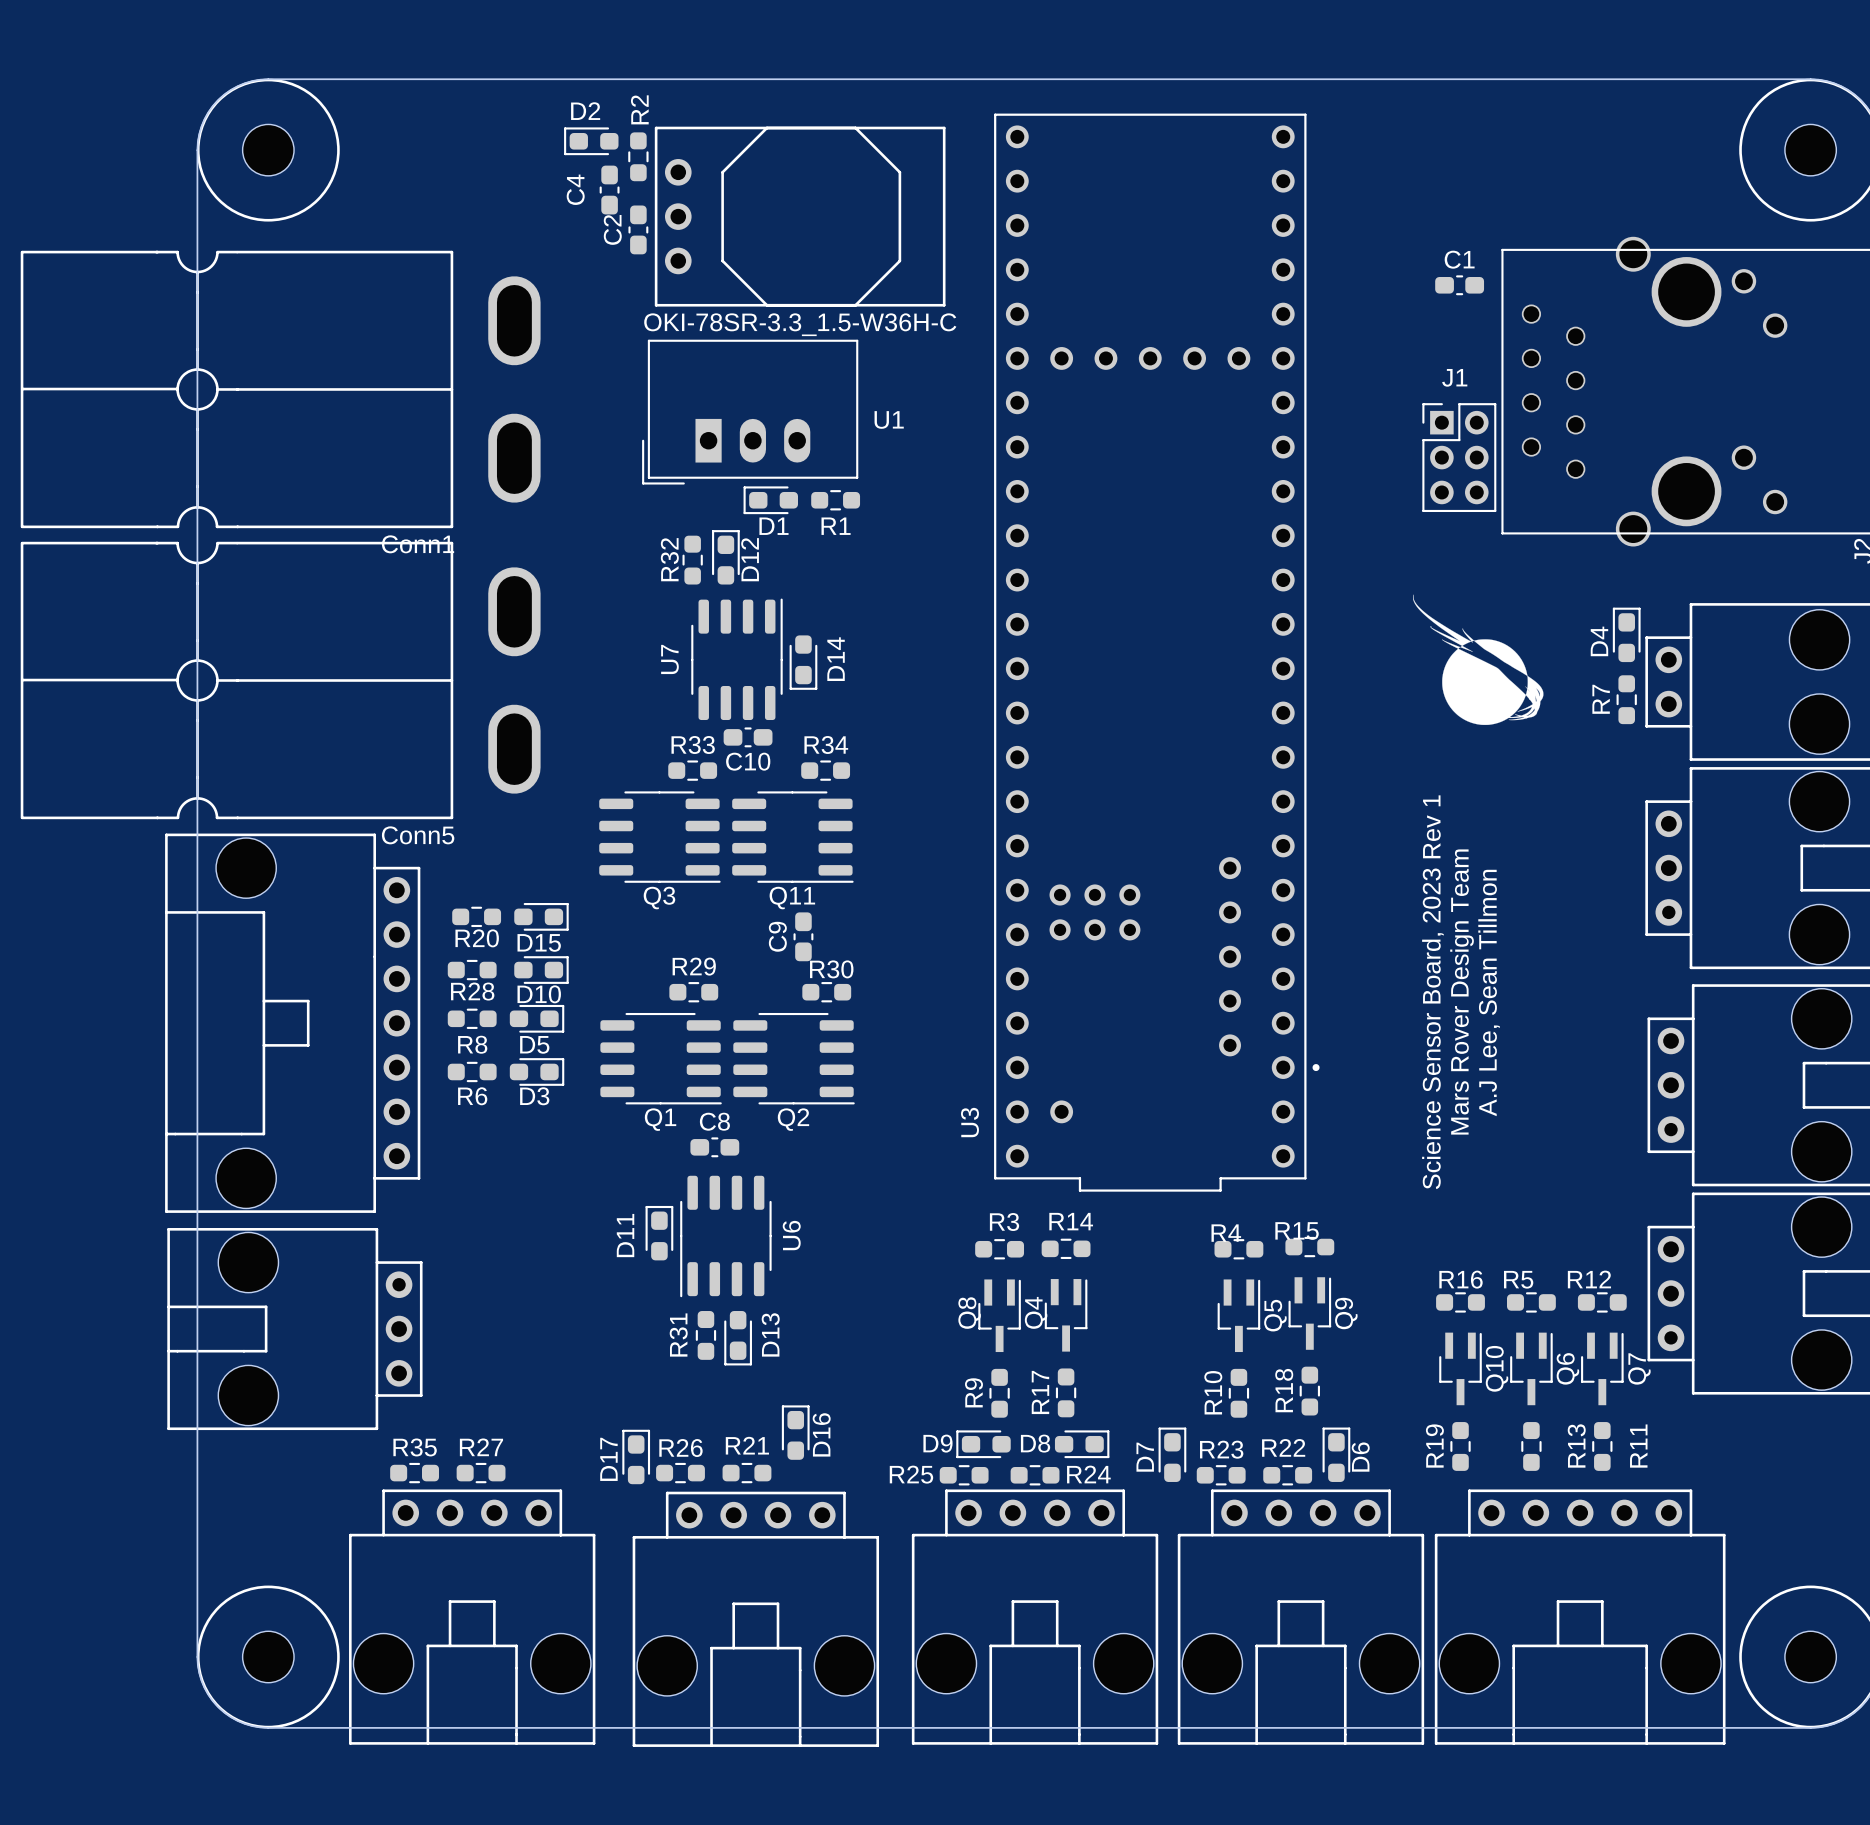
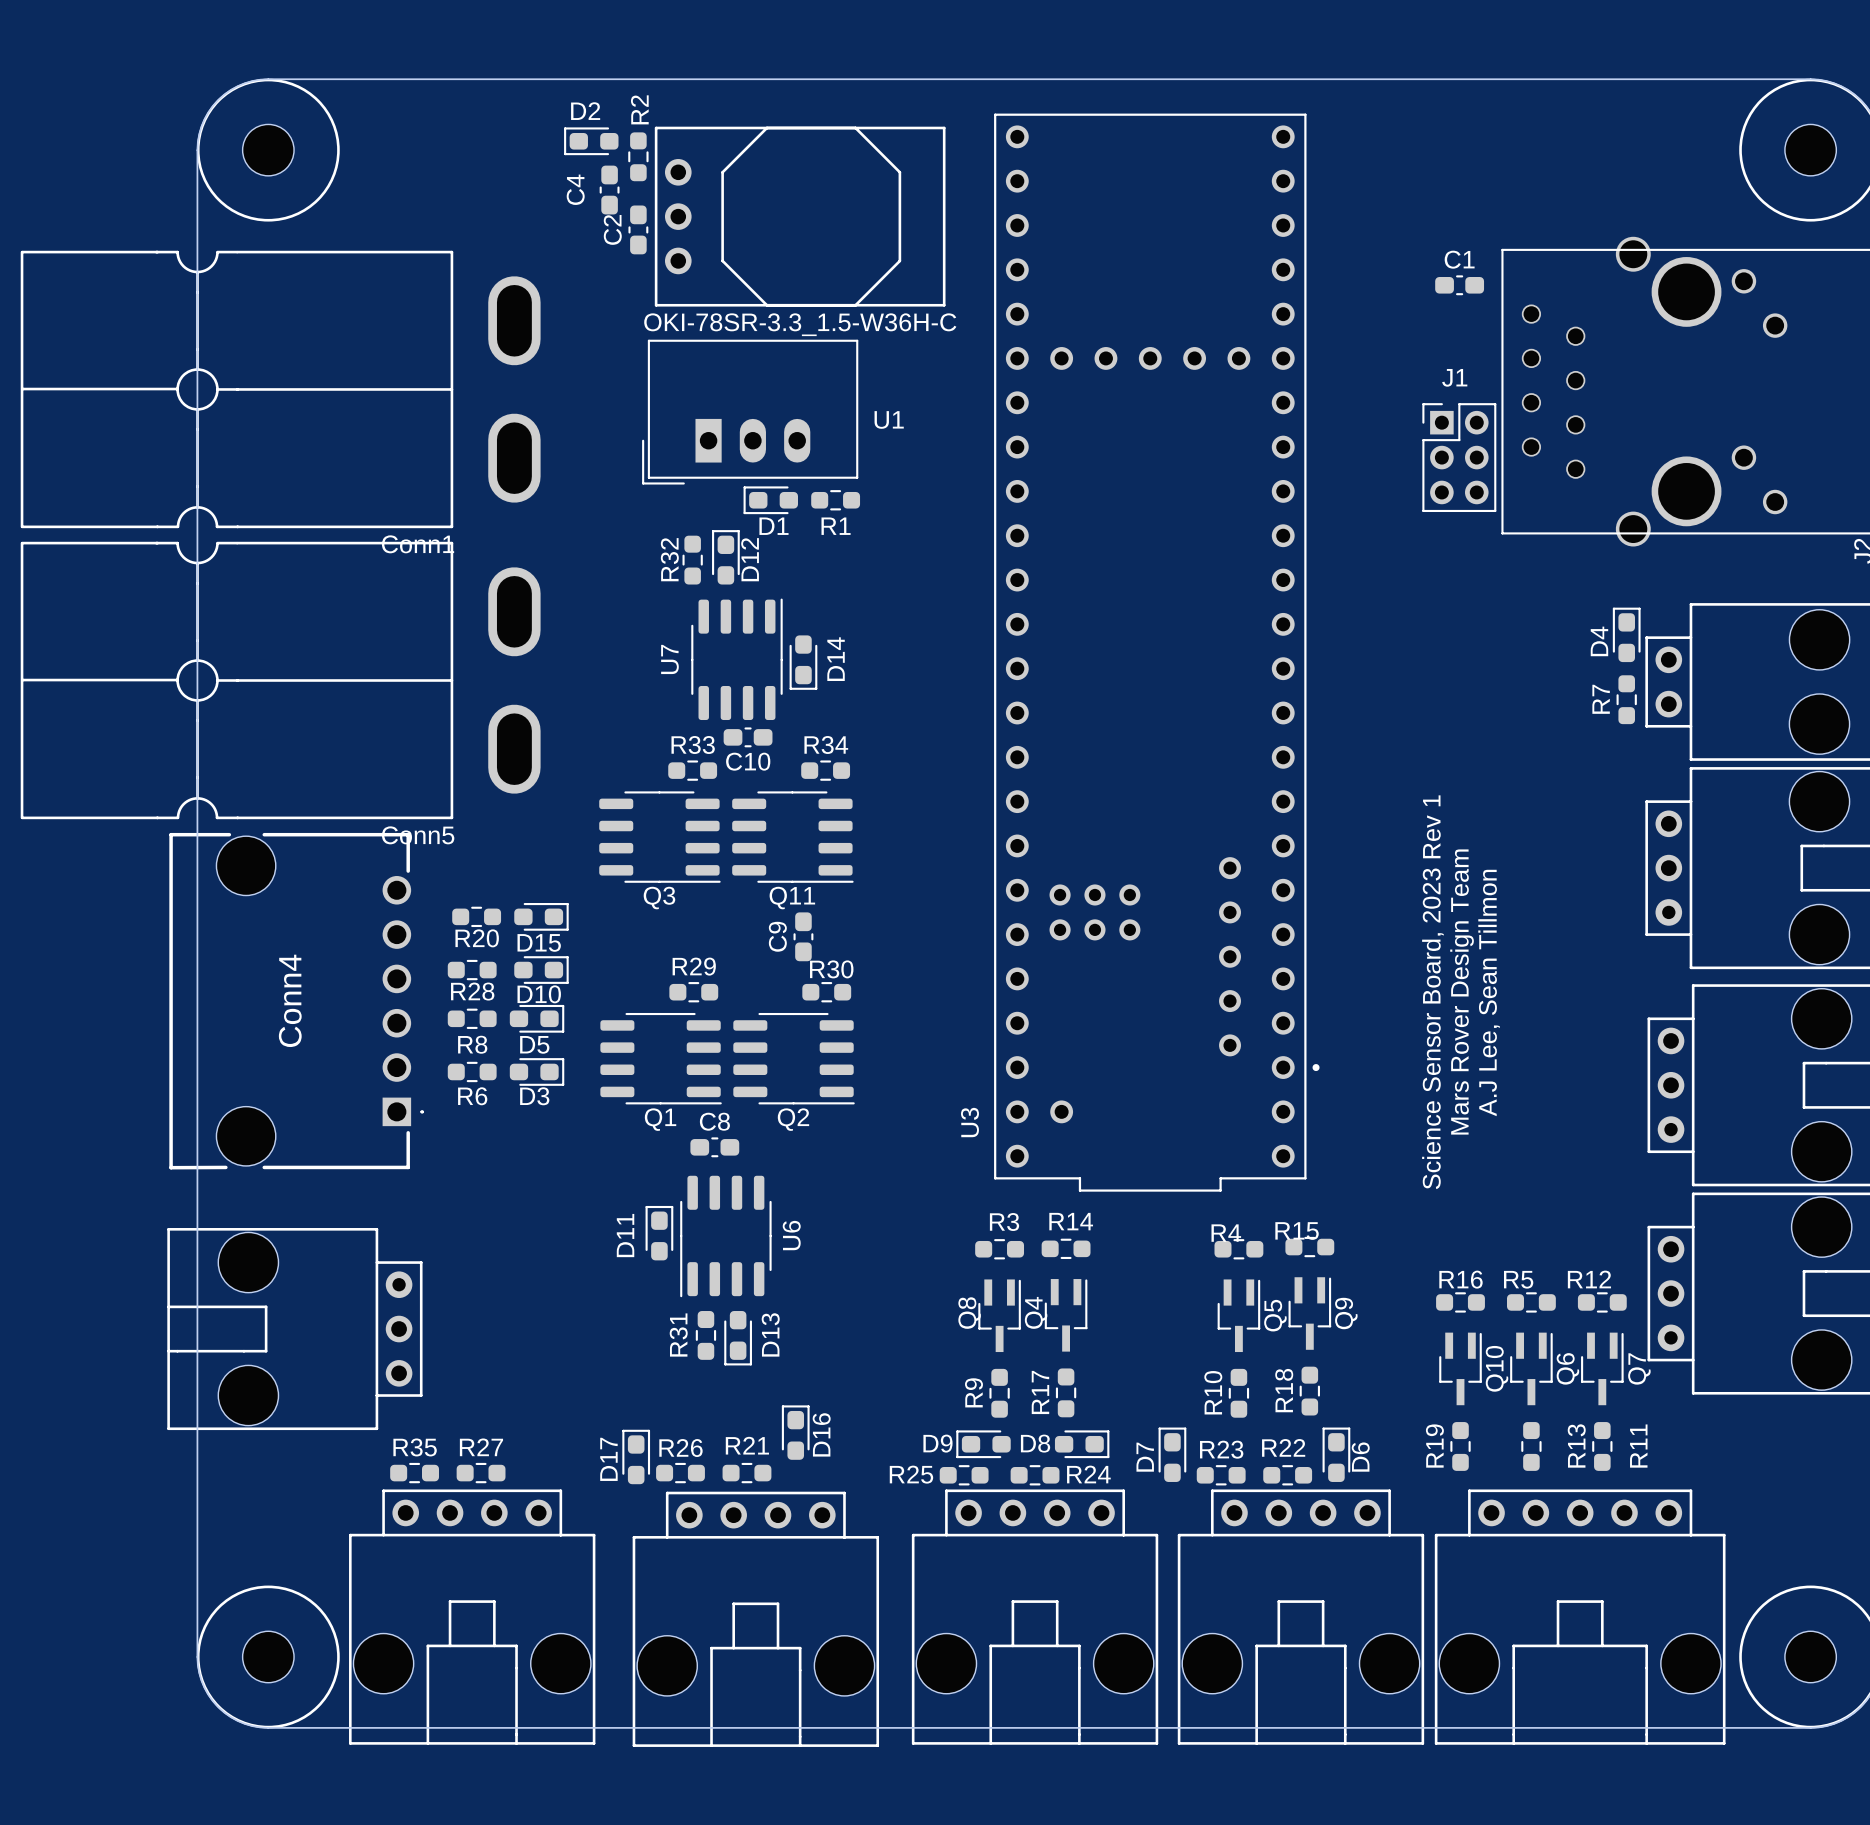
drawing: [1413, 594, 1544, 725] -> none
Conn4: none -> (296, 1001)
part: (292, 1023) -> none

